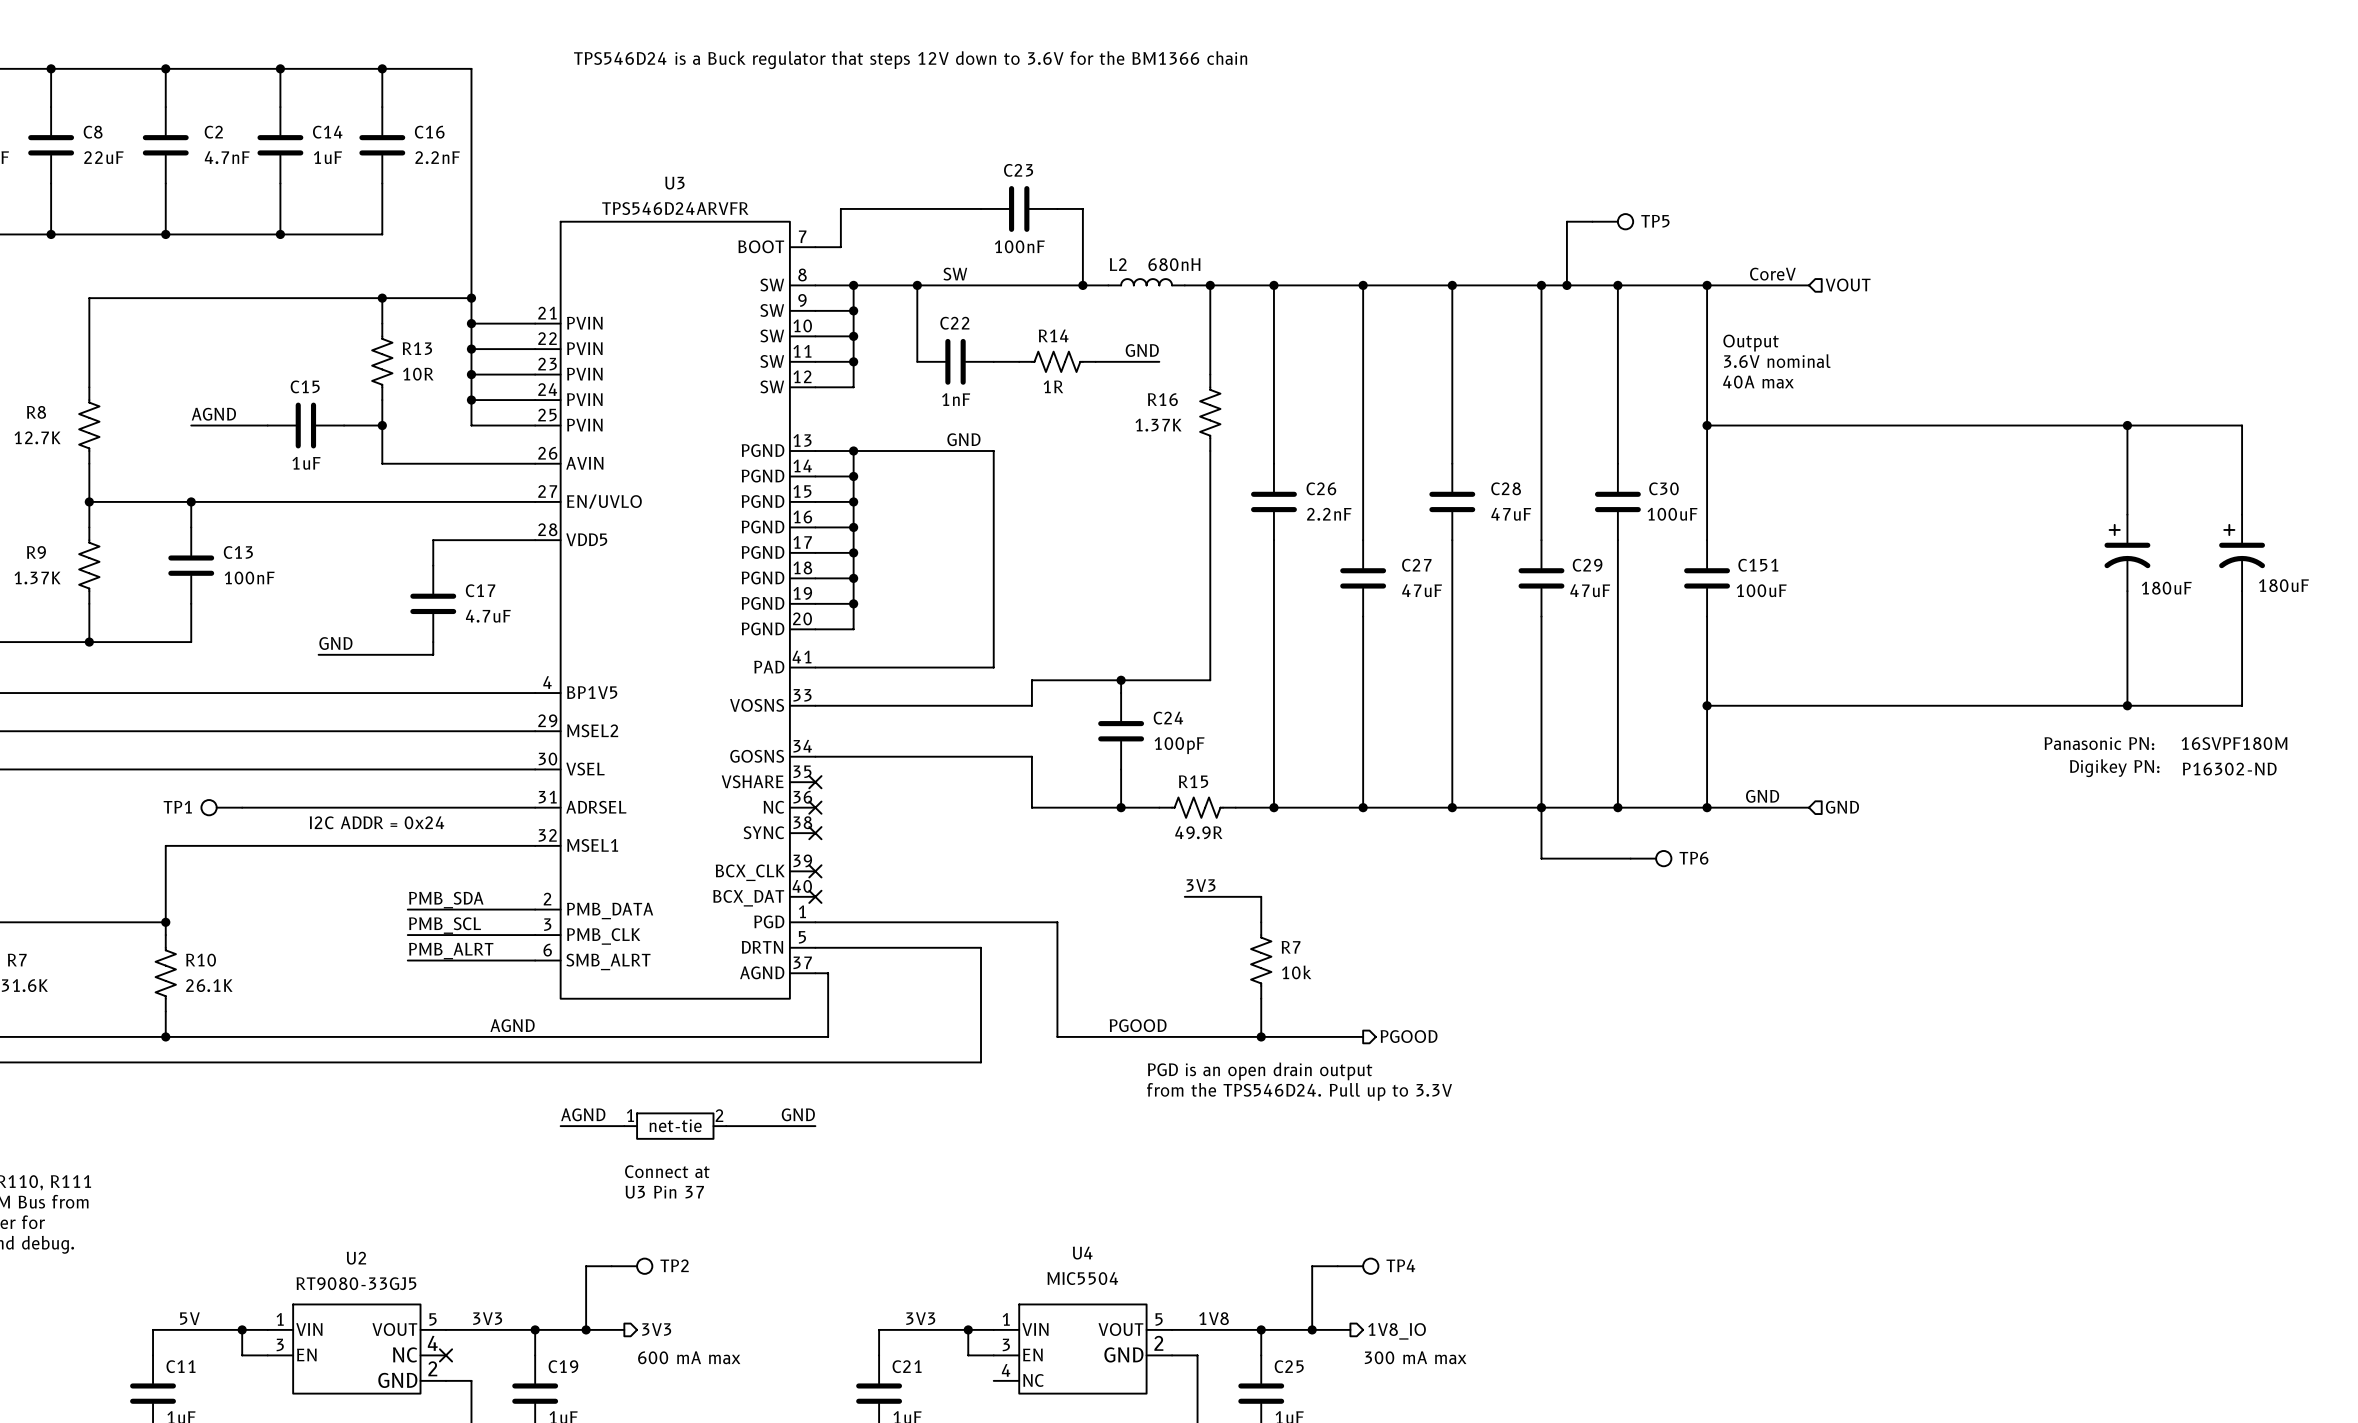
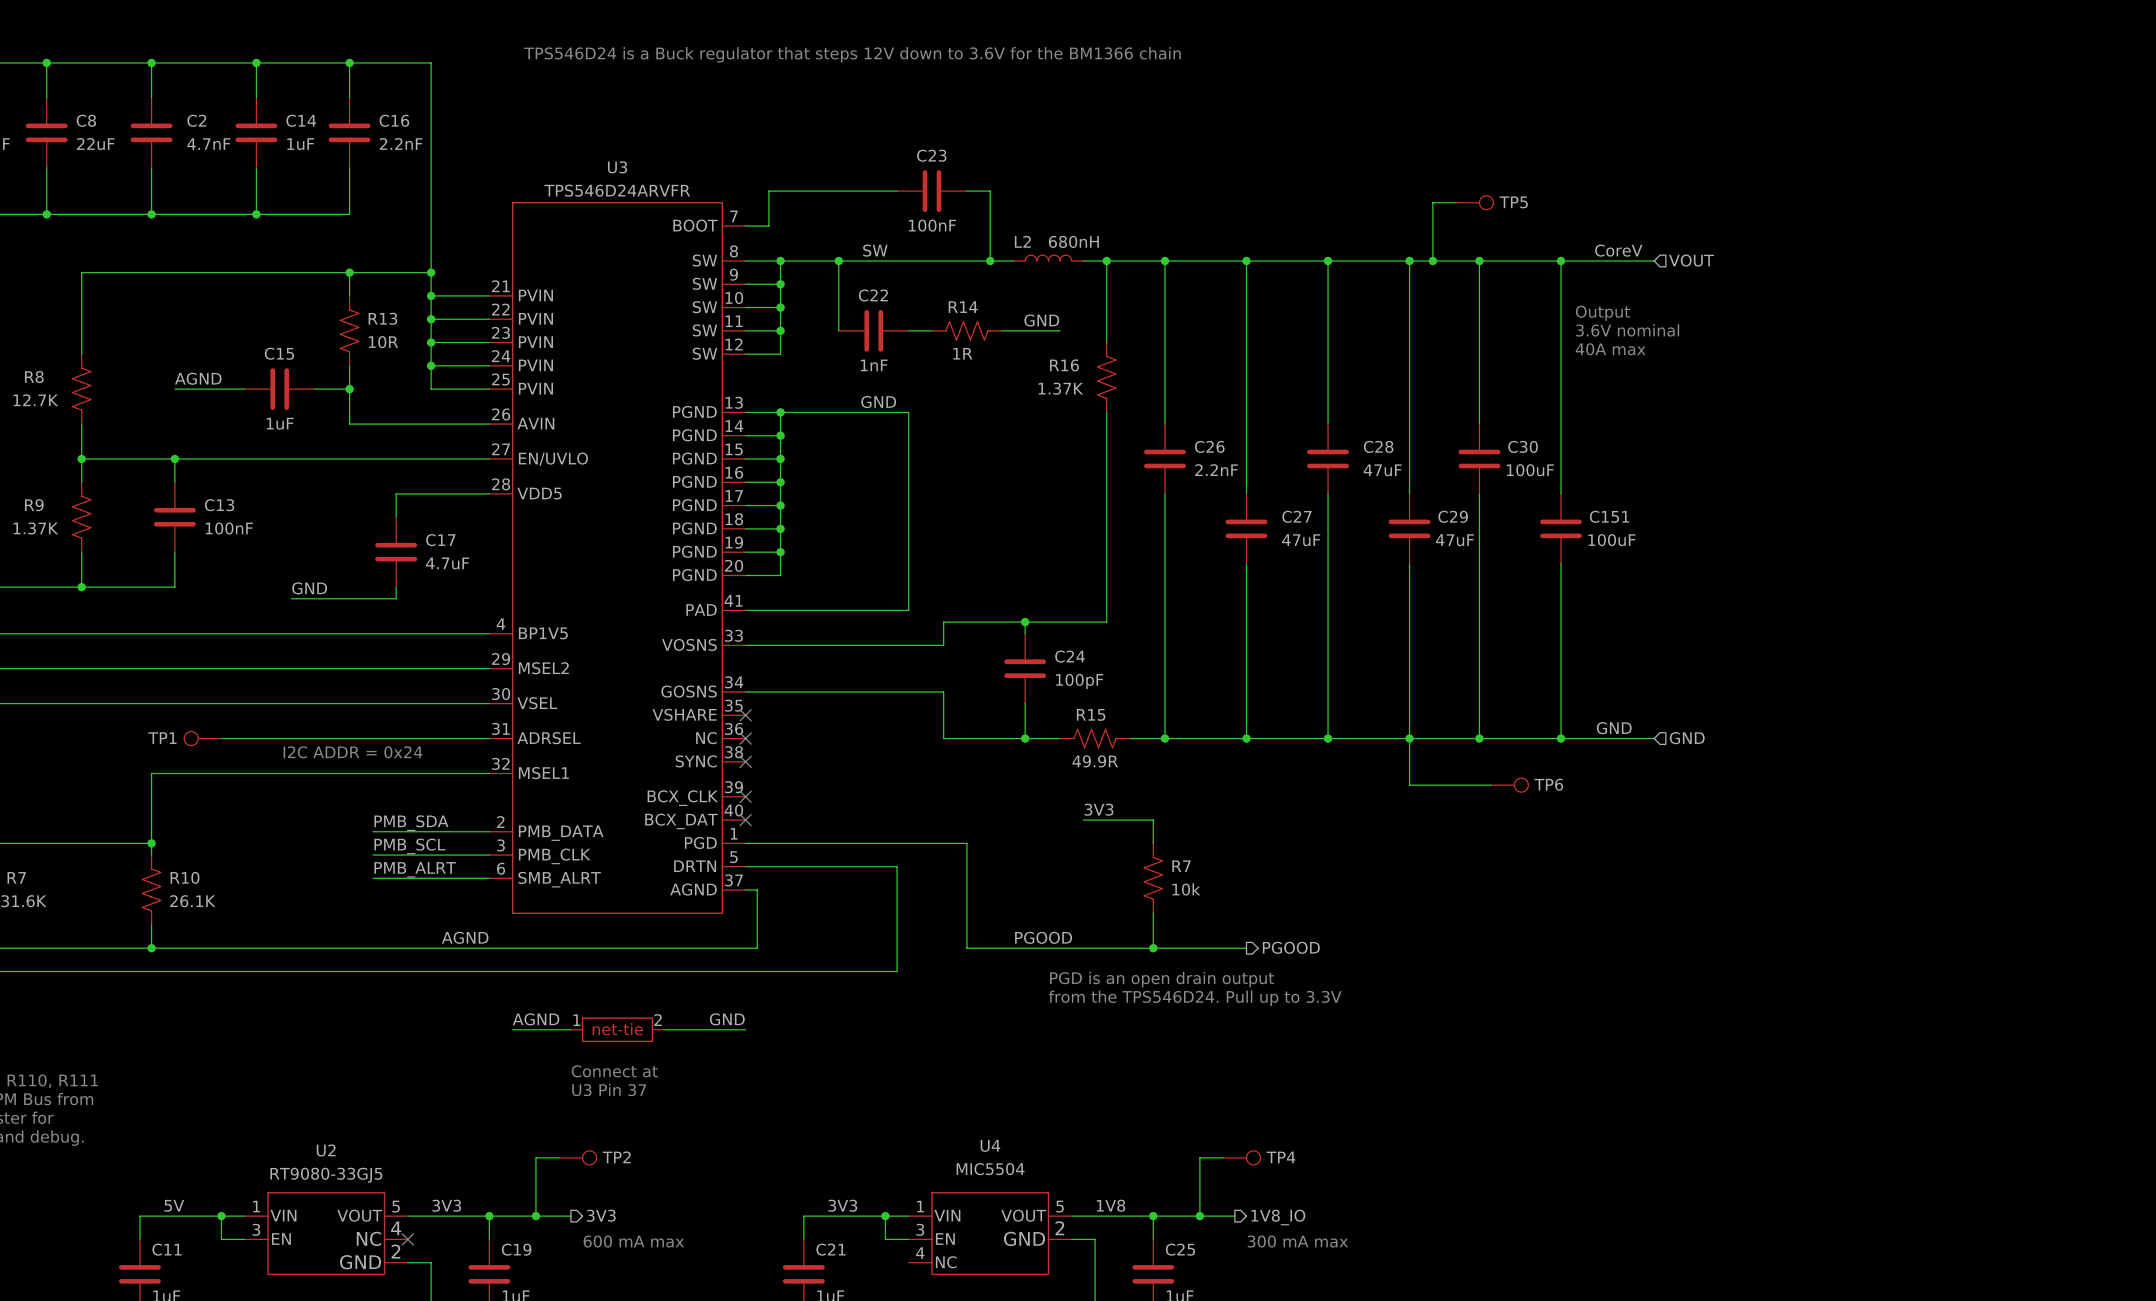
wire: (1707, 425) (2242, 425) (2242, 514) -> none
junction: (1707, 425) -> none
wire: (2127, 425) (2127, 514) -> none
junction: (2127, 425) -> none
part: 180uF (2127, 552) -> none
part: 180uF (2242, 552) -> none
wire: (2127, 591) (2127, 705) -> none
wire: (2242, 591) (2242, 705) (1707, 705) -> none
junction: (1707, 705) -> none
junction: (2127, 705) -> none
text: Panasonic PN: (2099, 743) -> none
text: Digikey PN: (2114, 768) -> none

